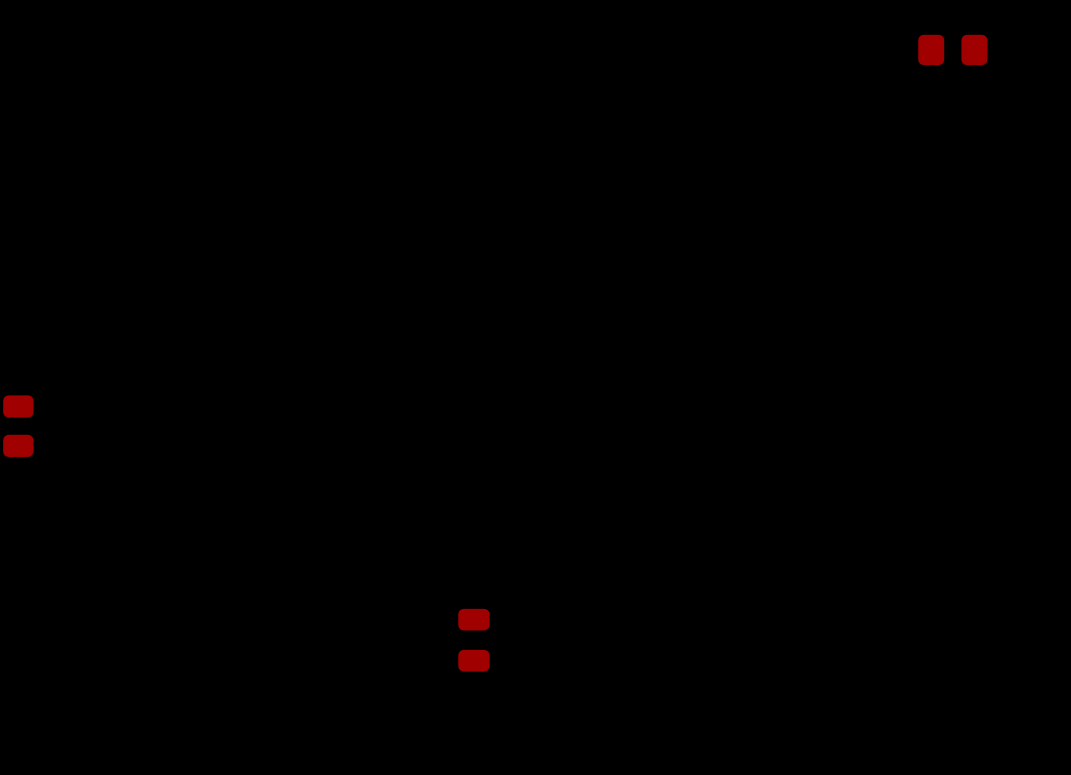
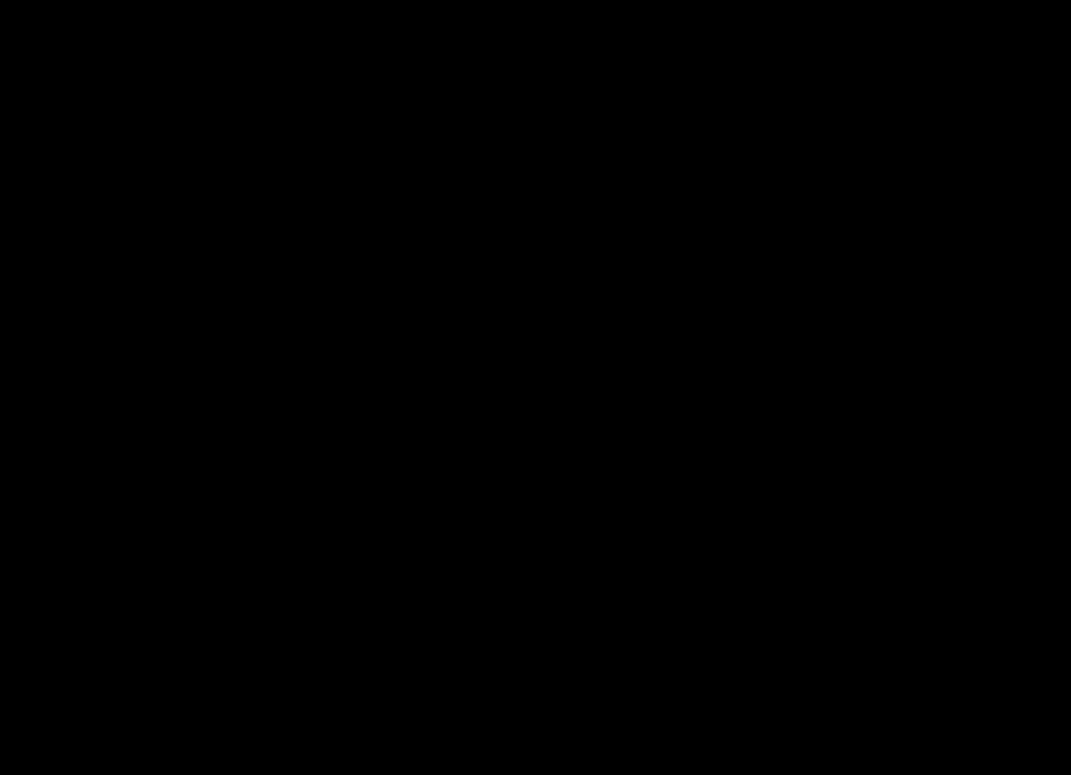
part: (952, 49) -> none
part: (18, 426) -> none
part: (473, 640) -> none

